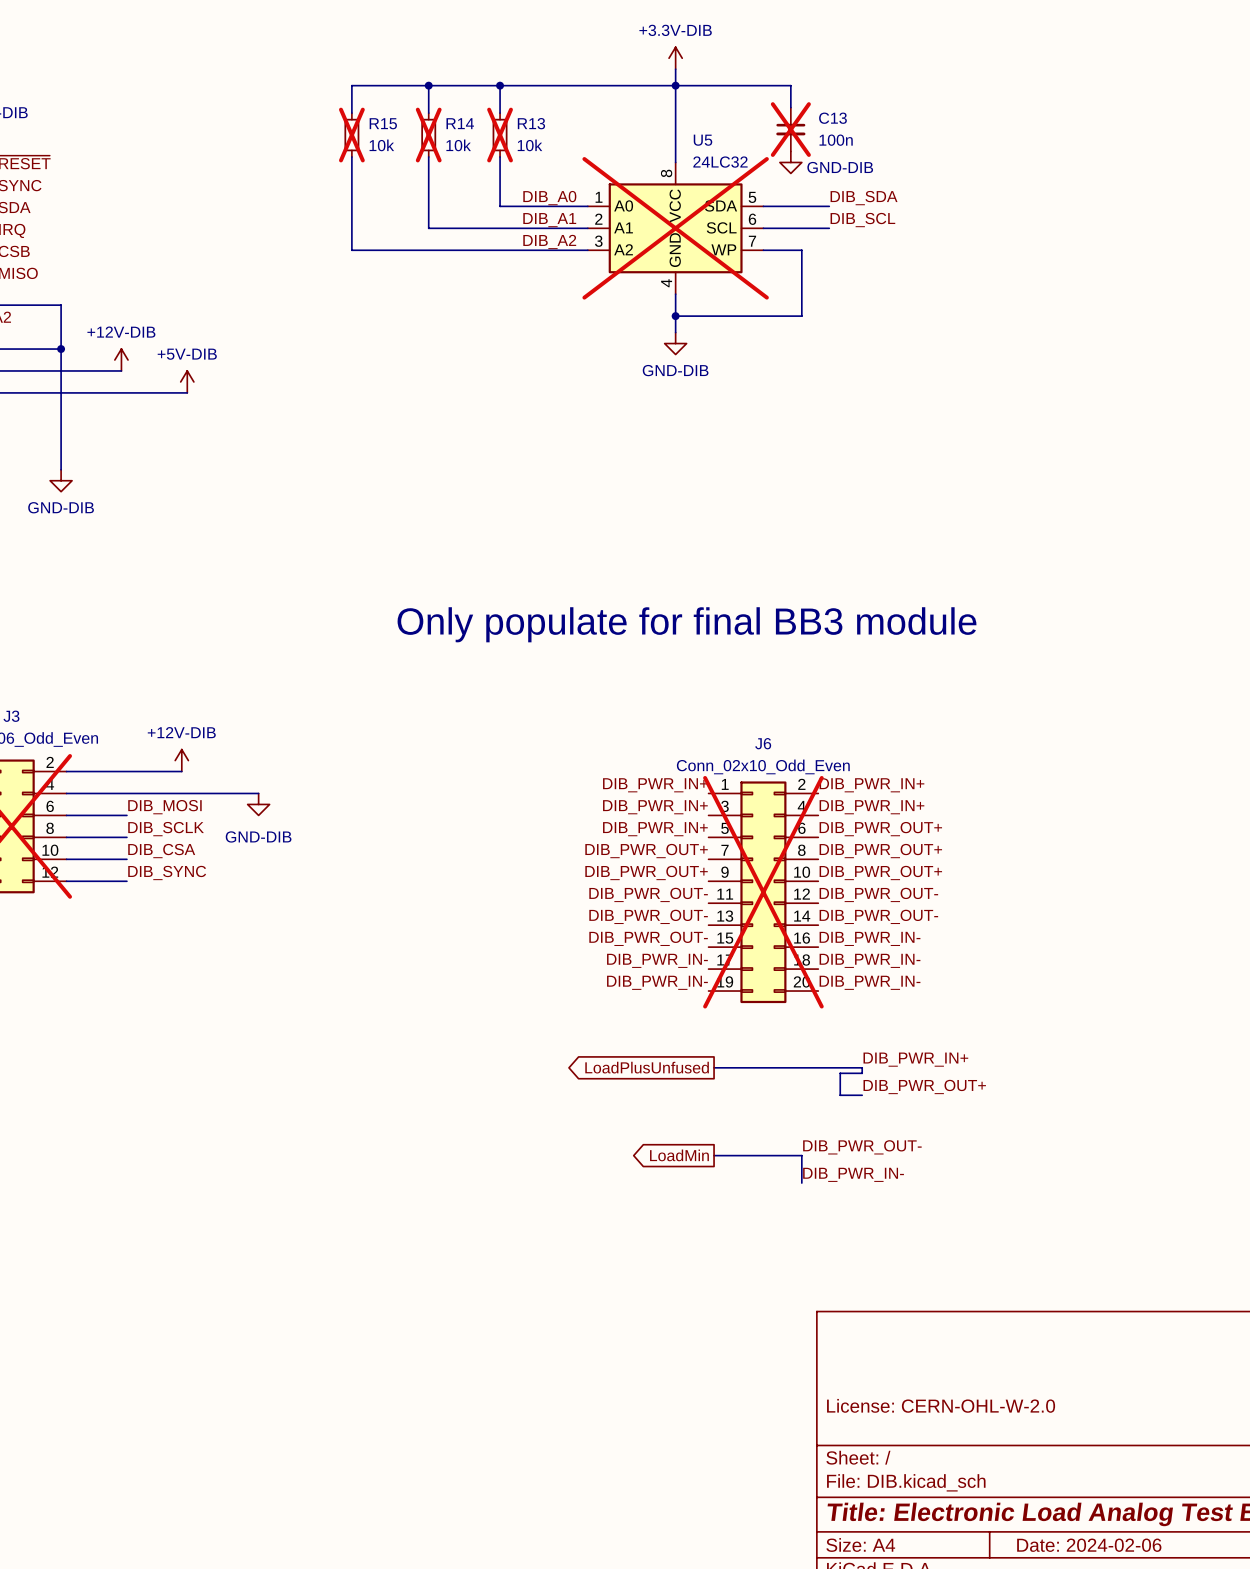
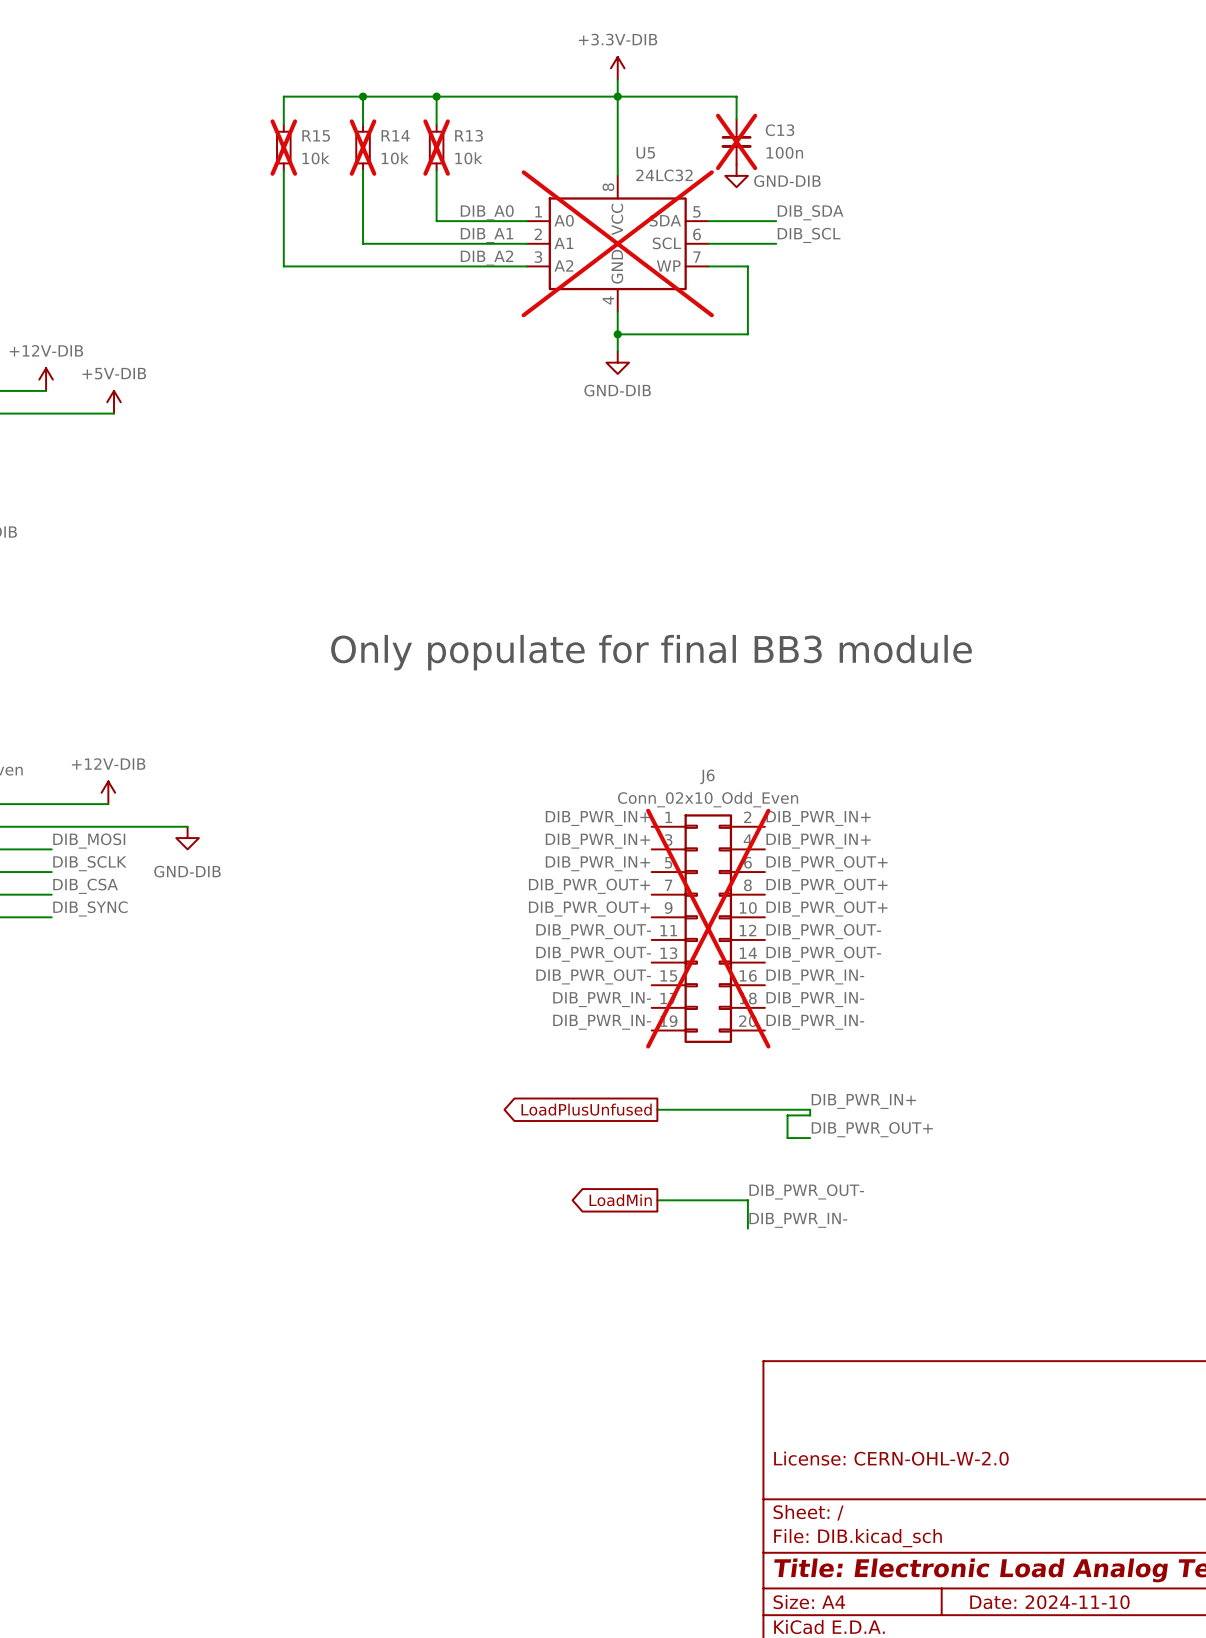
title block: Date: 2024-02-06 (1089, 1545) -> Date: 2024-11-10 (1049, 1602)

